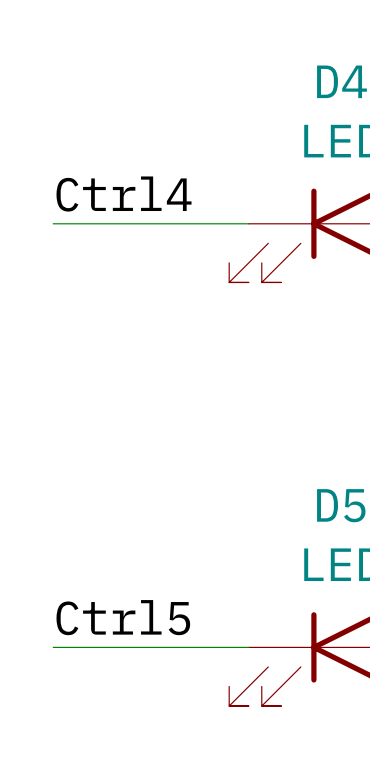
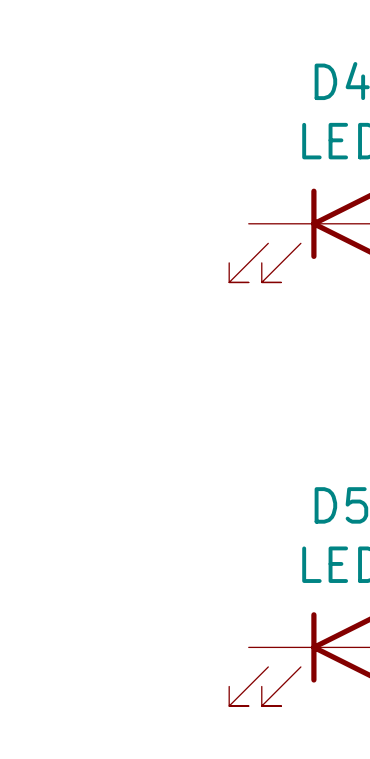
label: Ctrl4 (124, 194) -> none
wire: (53, 223) (248, 223) -> none
label: Ctrl5 (123, 617) -> none
wire: (53, 647) (248, 647) -> none

